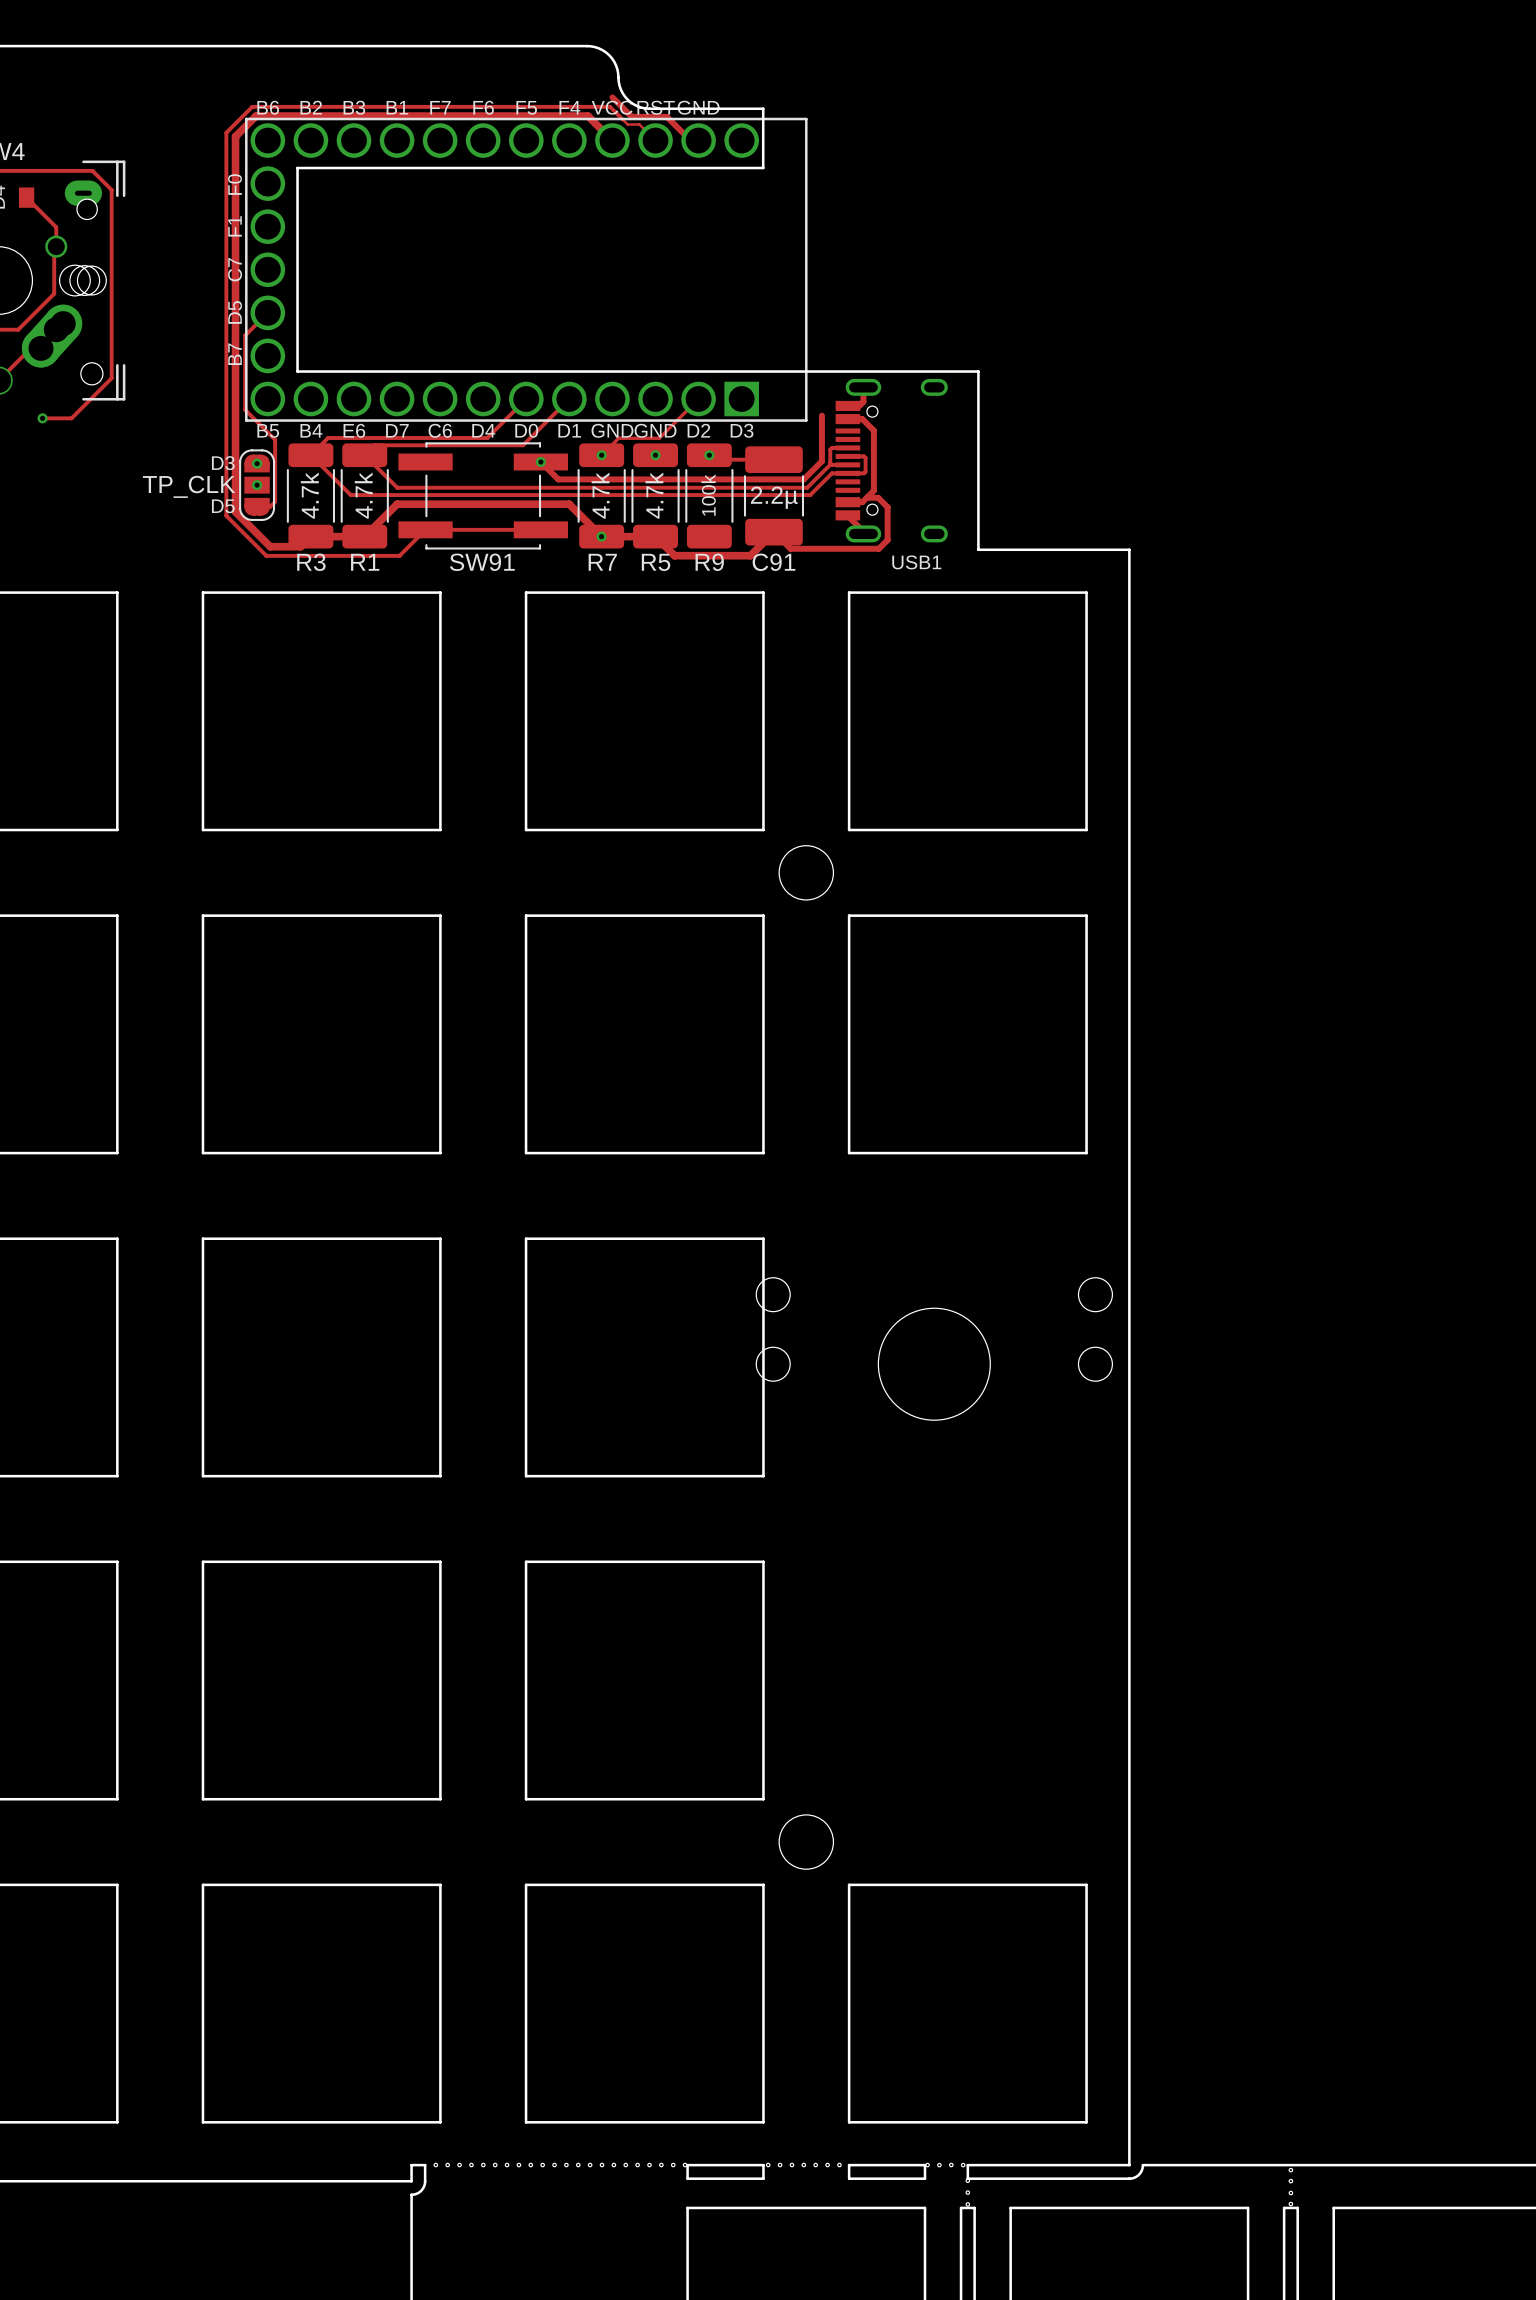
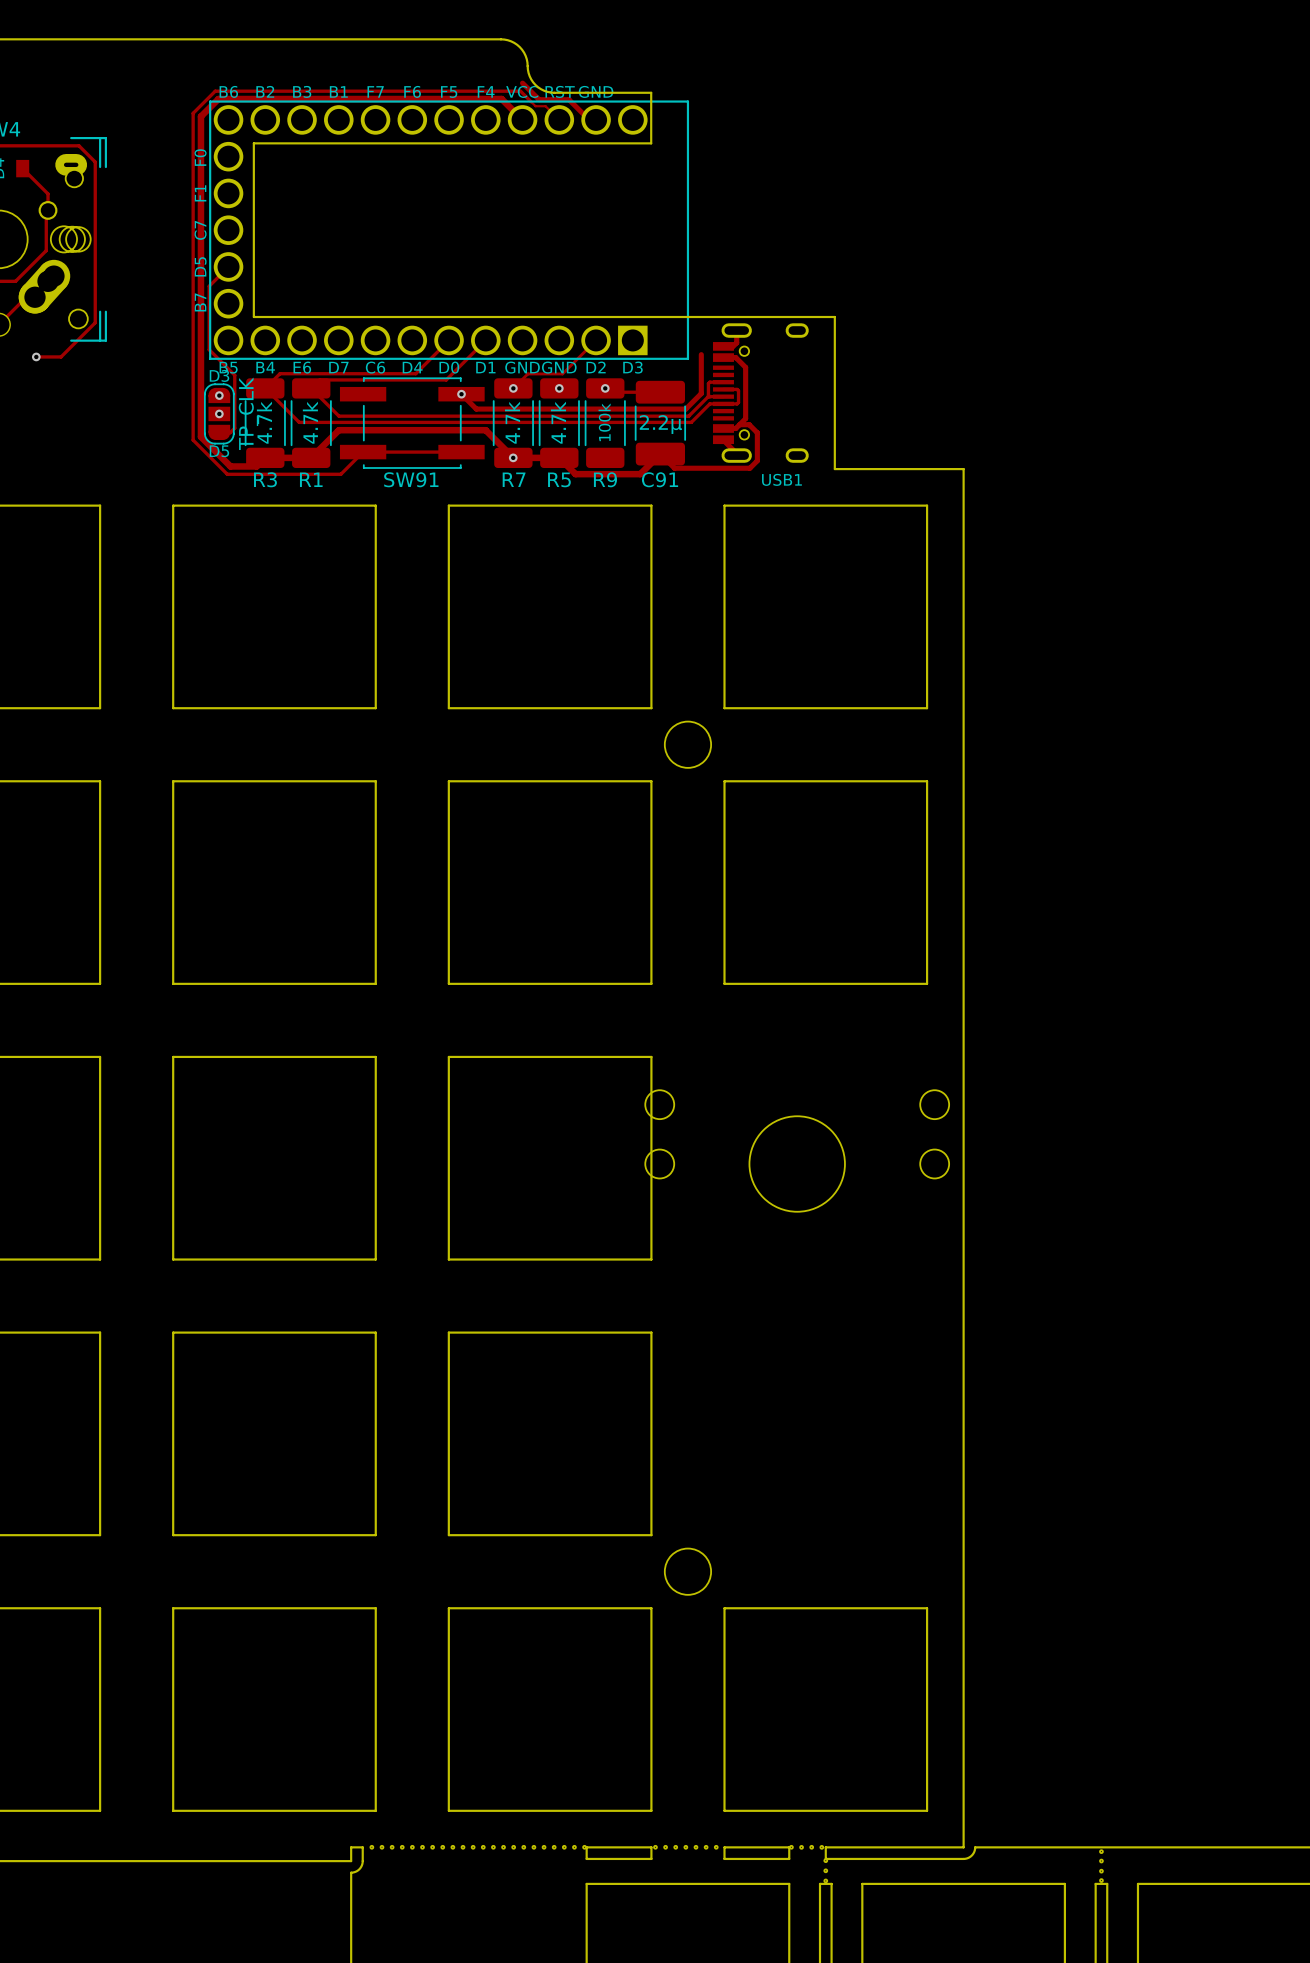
part text position: D3 (223, 463) -> D3 (219, 375)
part value rotation: 0° (189, 486) -> 90° counterclockwise (248, 413)
part value position: TP_CLK (189, 486) -> TP_CLK (248, 413)
part text position: D5 (223, 506) -> D5 (219, 451)

